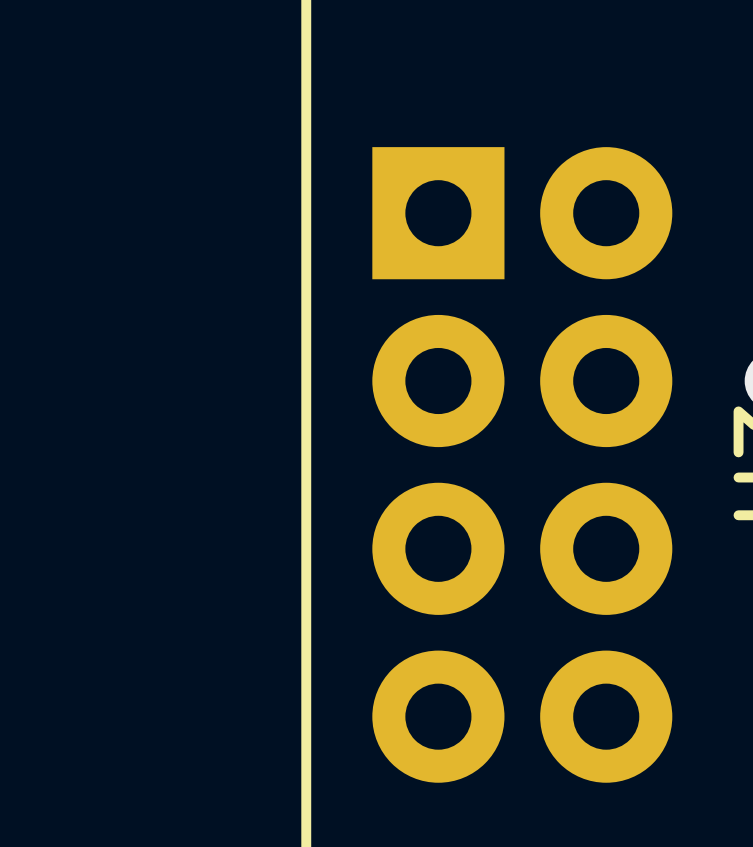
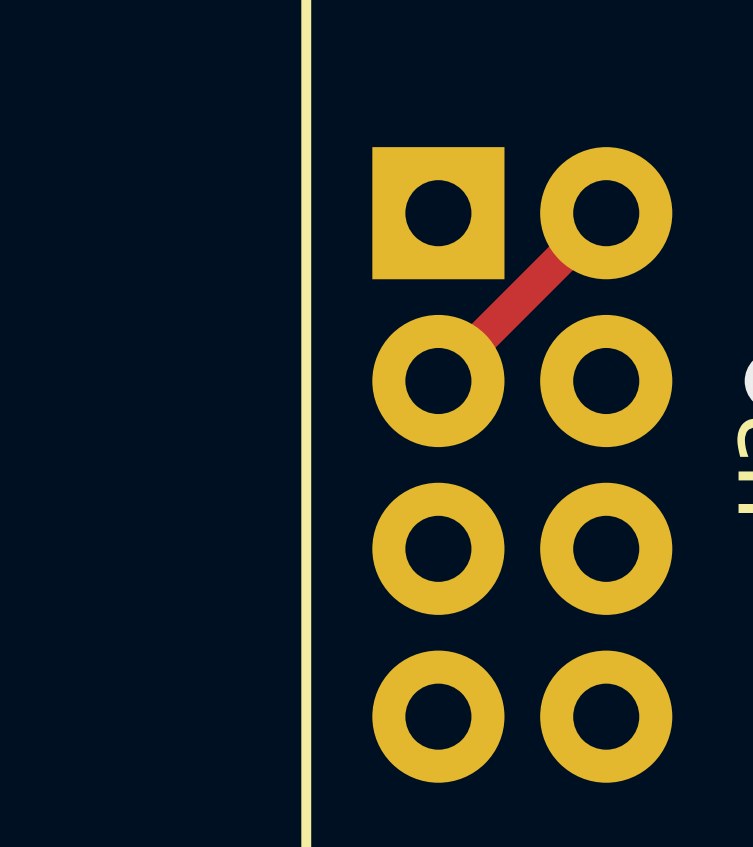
track: none -> (606, 213) (438, 381)

